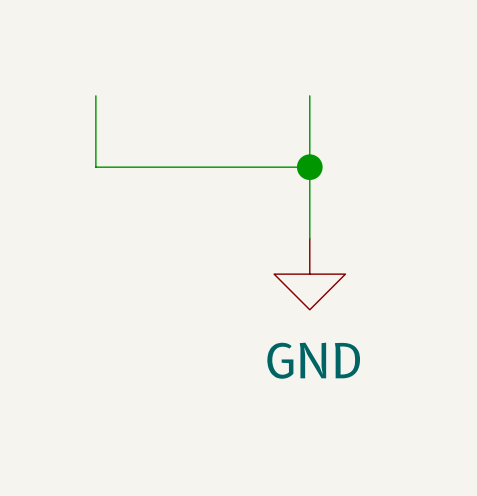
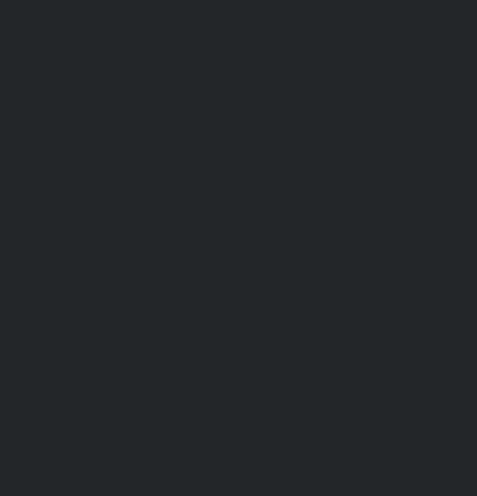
wire: (95, 95) (95, 167) (309, 167) -> none
wire: (309, 95) (309, 238) -> none
junction: (309, 167) -> none
power symbol: GND (309, 274) -> none

